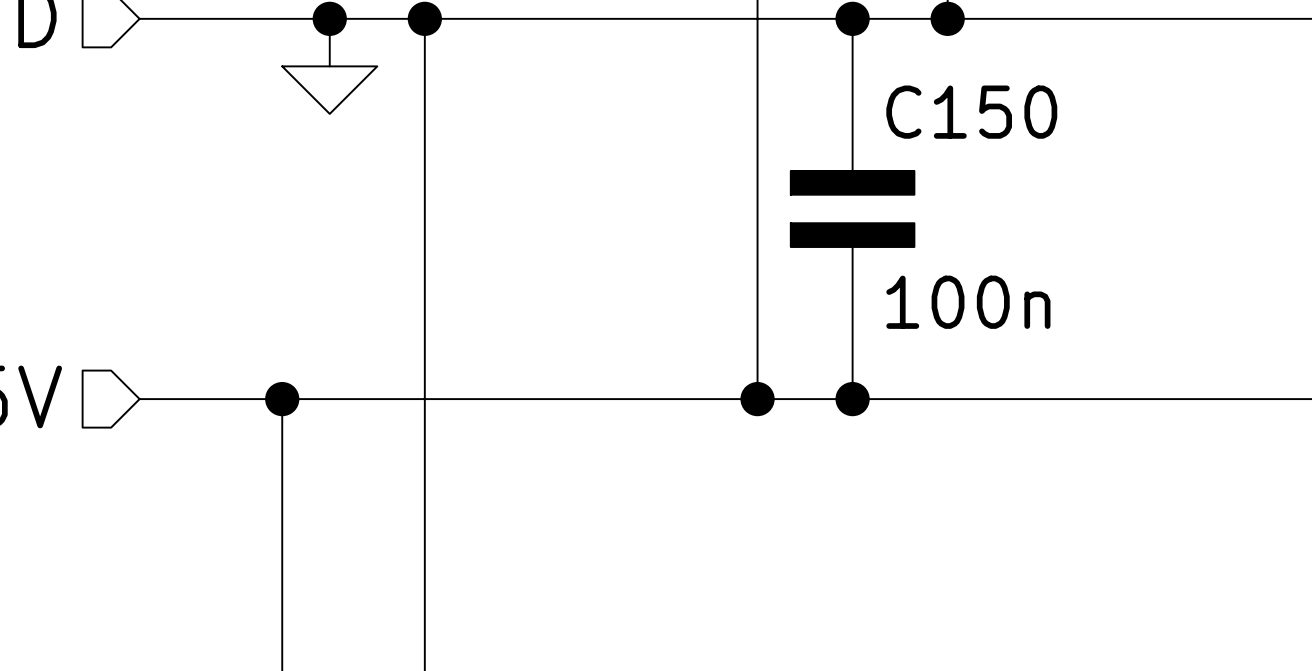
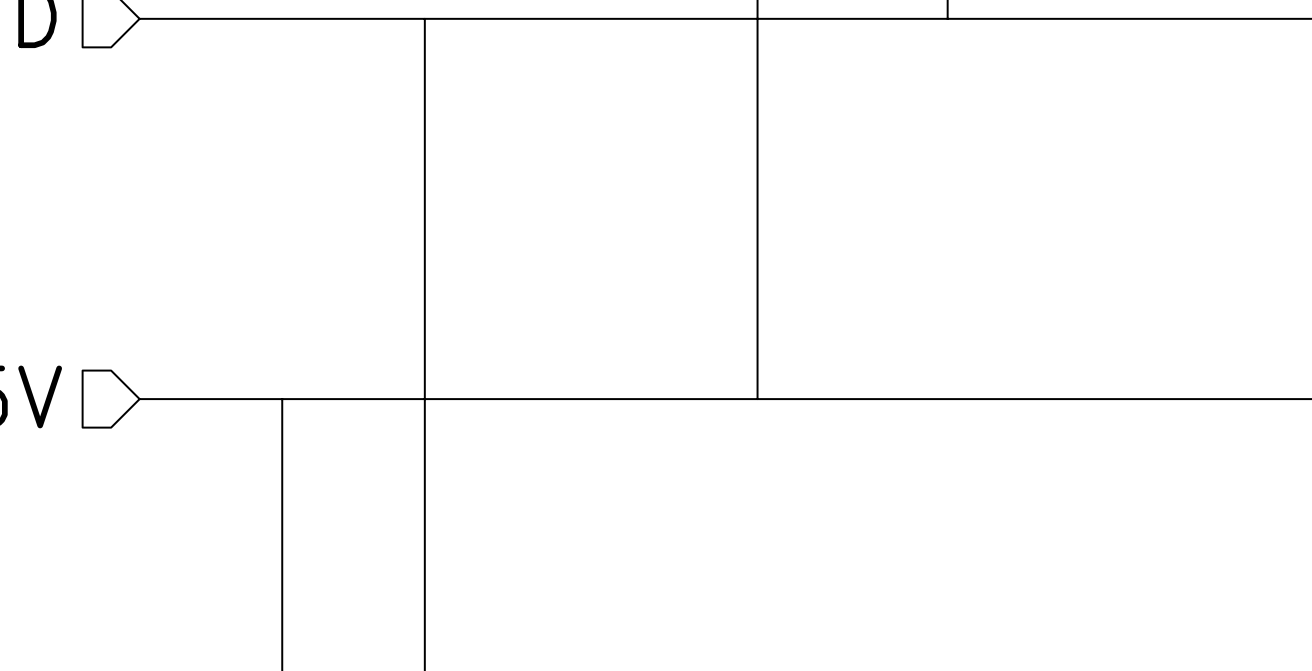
wire: (329, 18) (329, 66) -> none
junction: (329, 18) -> none
junction: (424, 18) -> none
junction: (852, 18) -> none
junction: (947, 18) -> none
power symbol: (329, 90) -> none
C150: 100n (852, 208) -> none
junction: (282, 399) -> none
junction: (757, 399) -> none
junction: (852, 399) -> none

